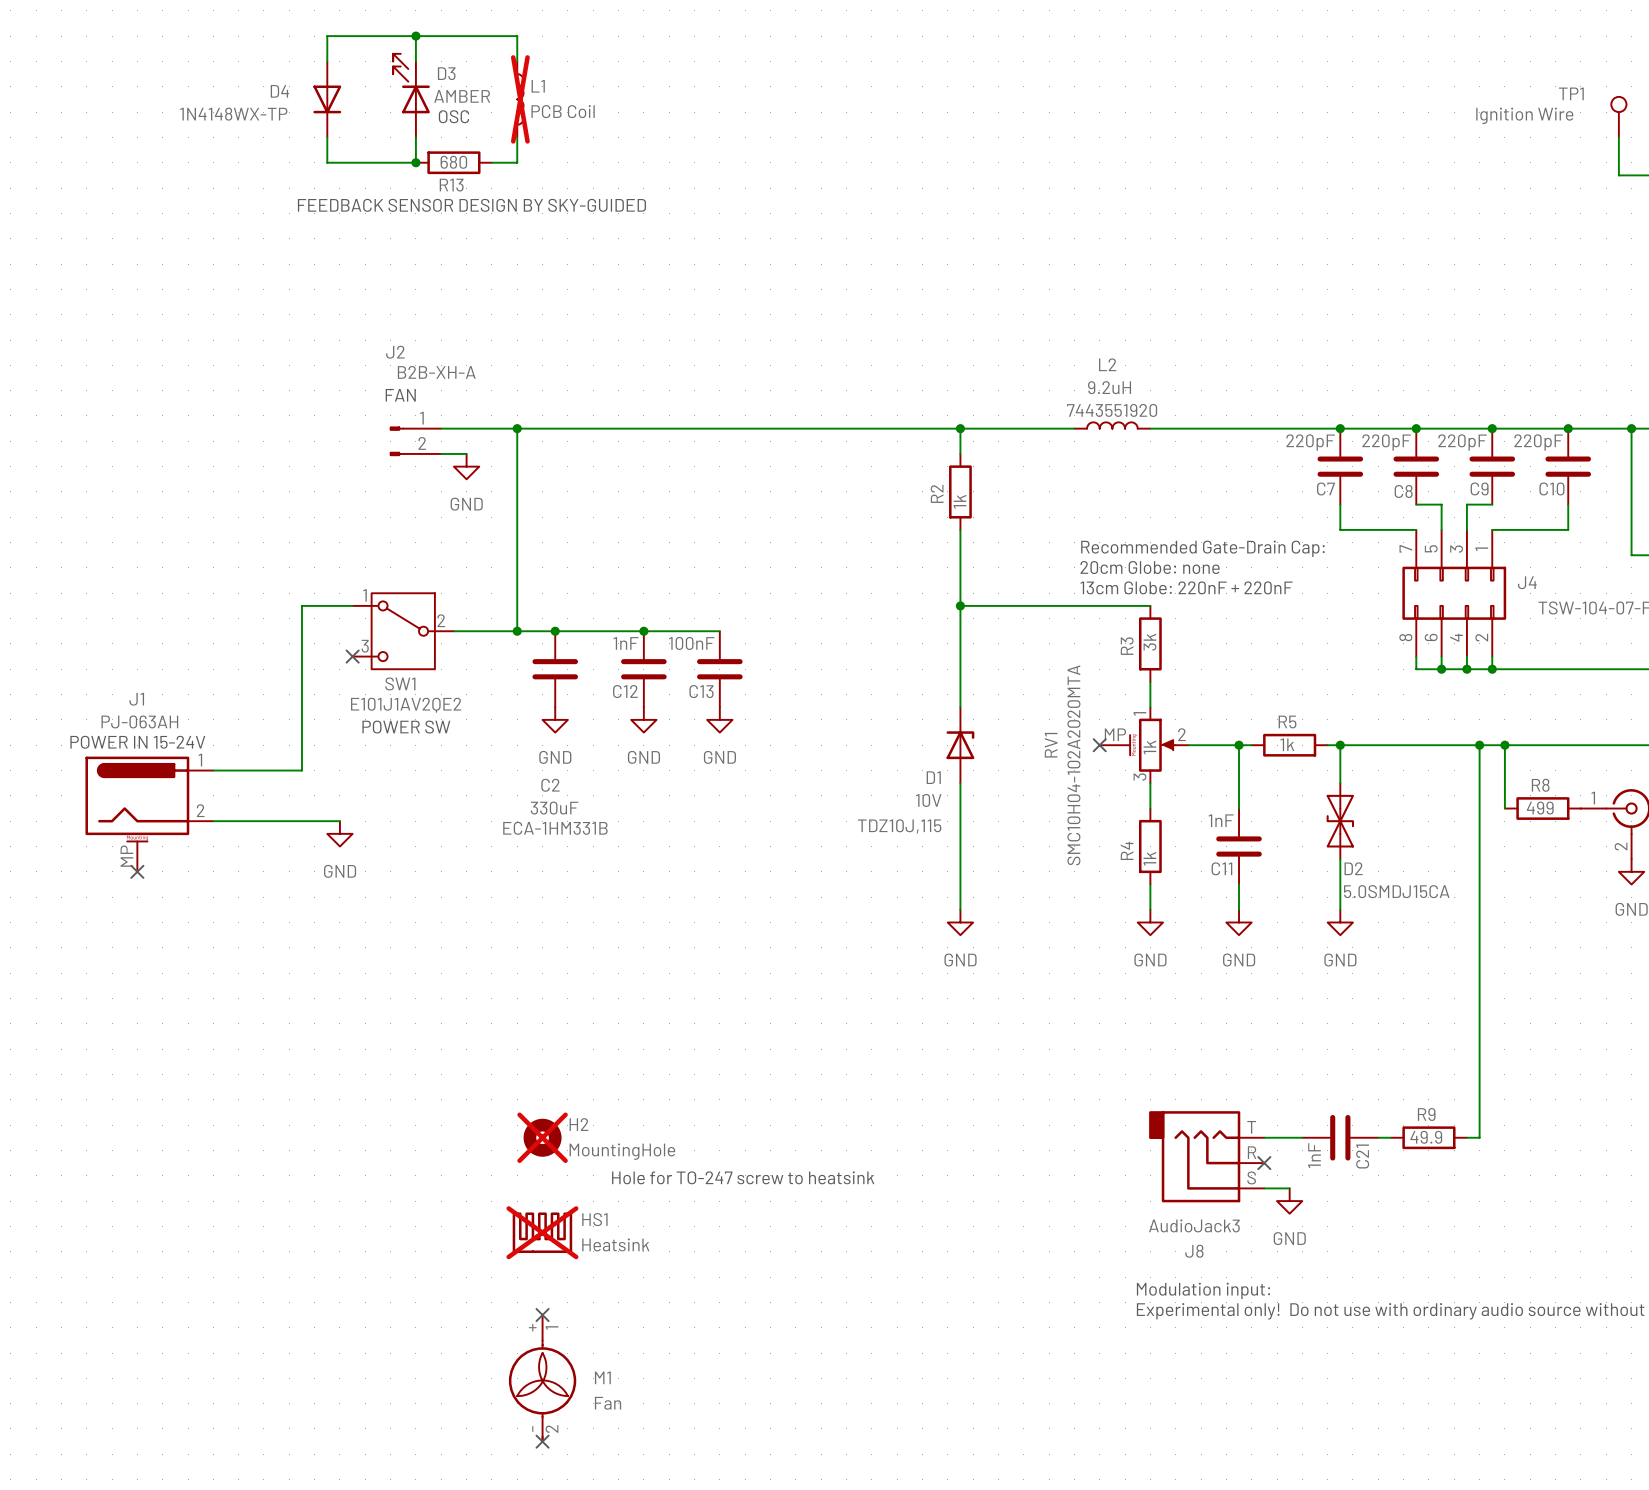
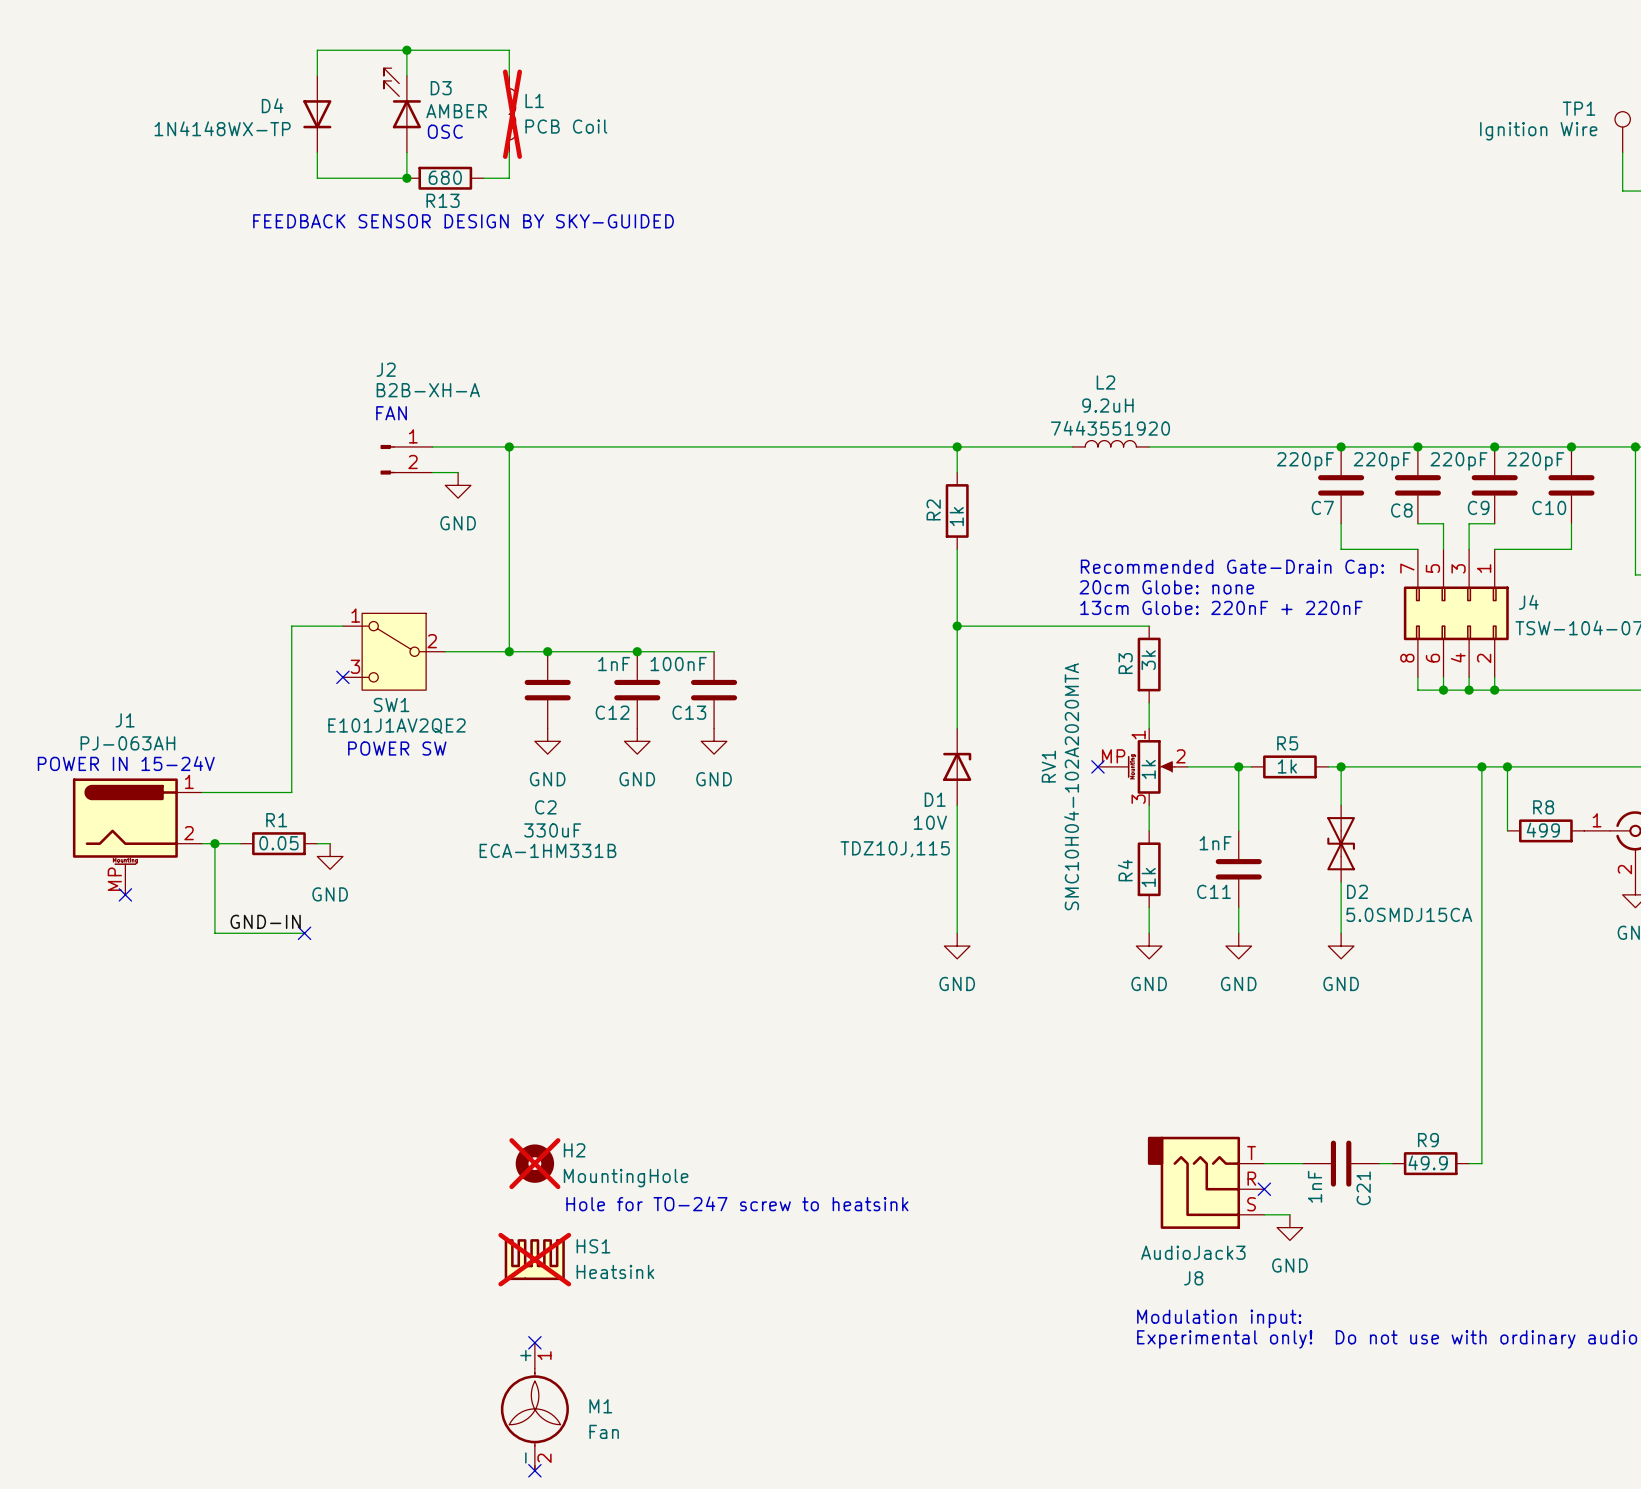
wire: none -> (214, 843) (214, 933) (304, 933)
junction: none -> (214, 843)
wire: (251, 821) (327, 821) -> none
R1: none -> 0.05 (278, 843)
label: none -> GND-IN (265, 921)
no-connect mark: none -> (304, 933)

